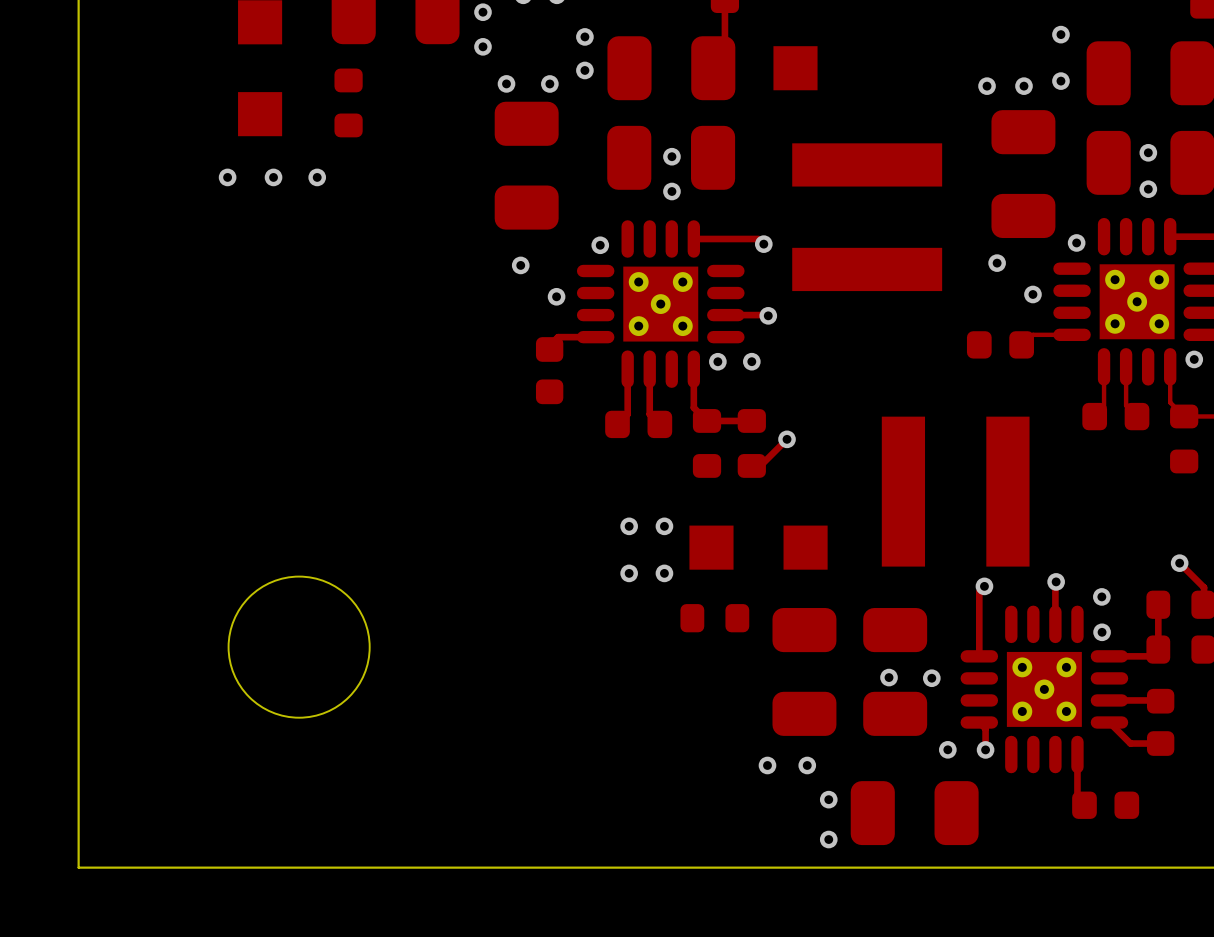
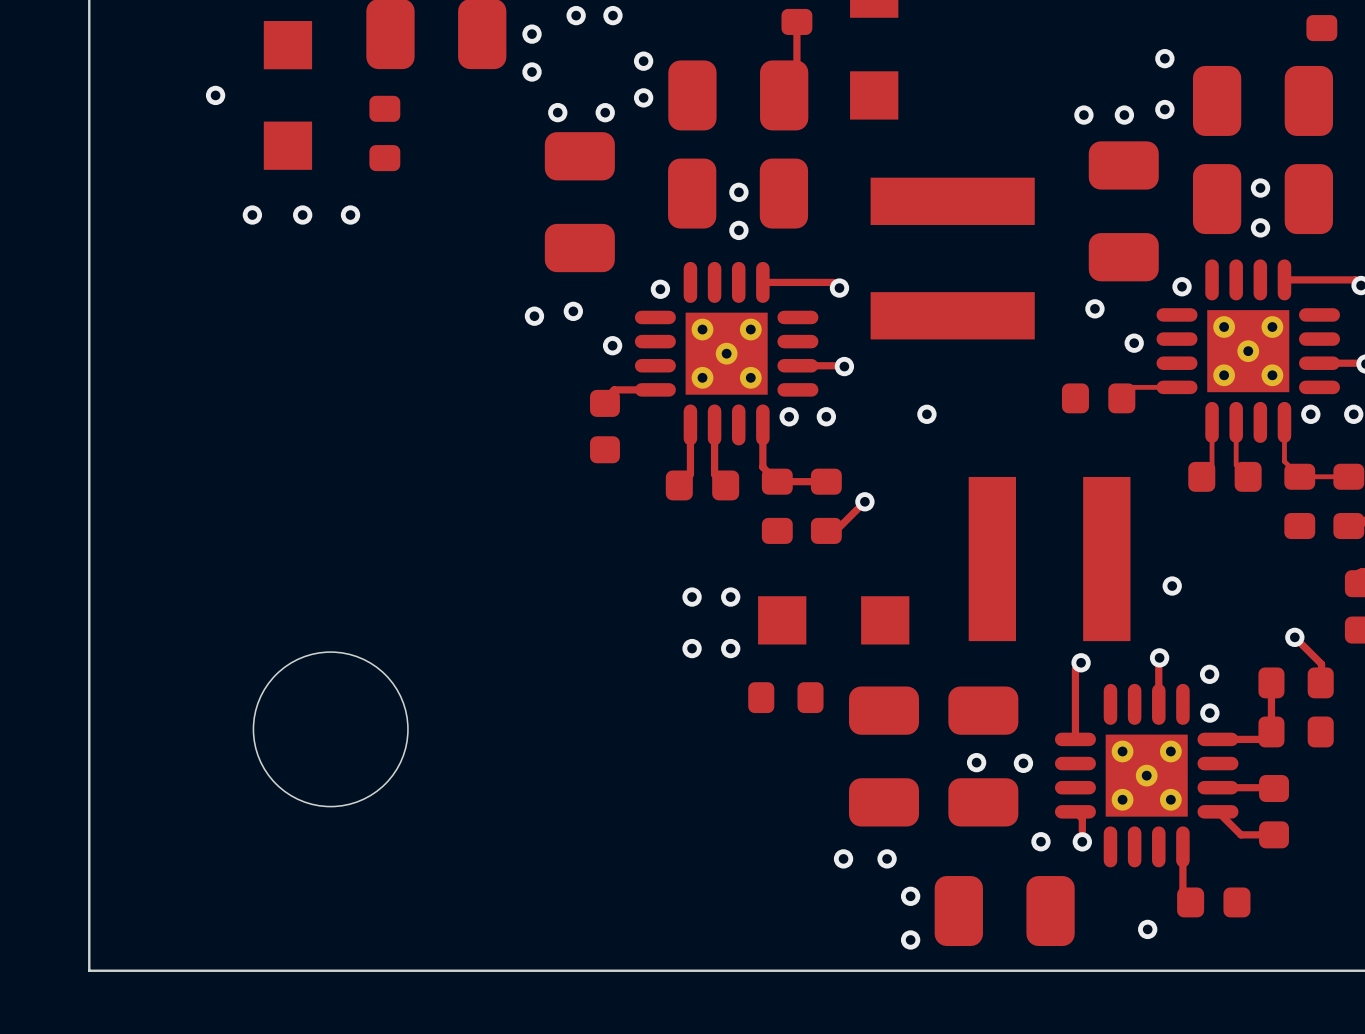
via: none -> (215, 95)
via: none -> (534, 316)
via: none -> (926, 414)
via: none -> (1172, 586)
via: none -> (1147, 929)

